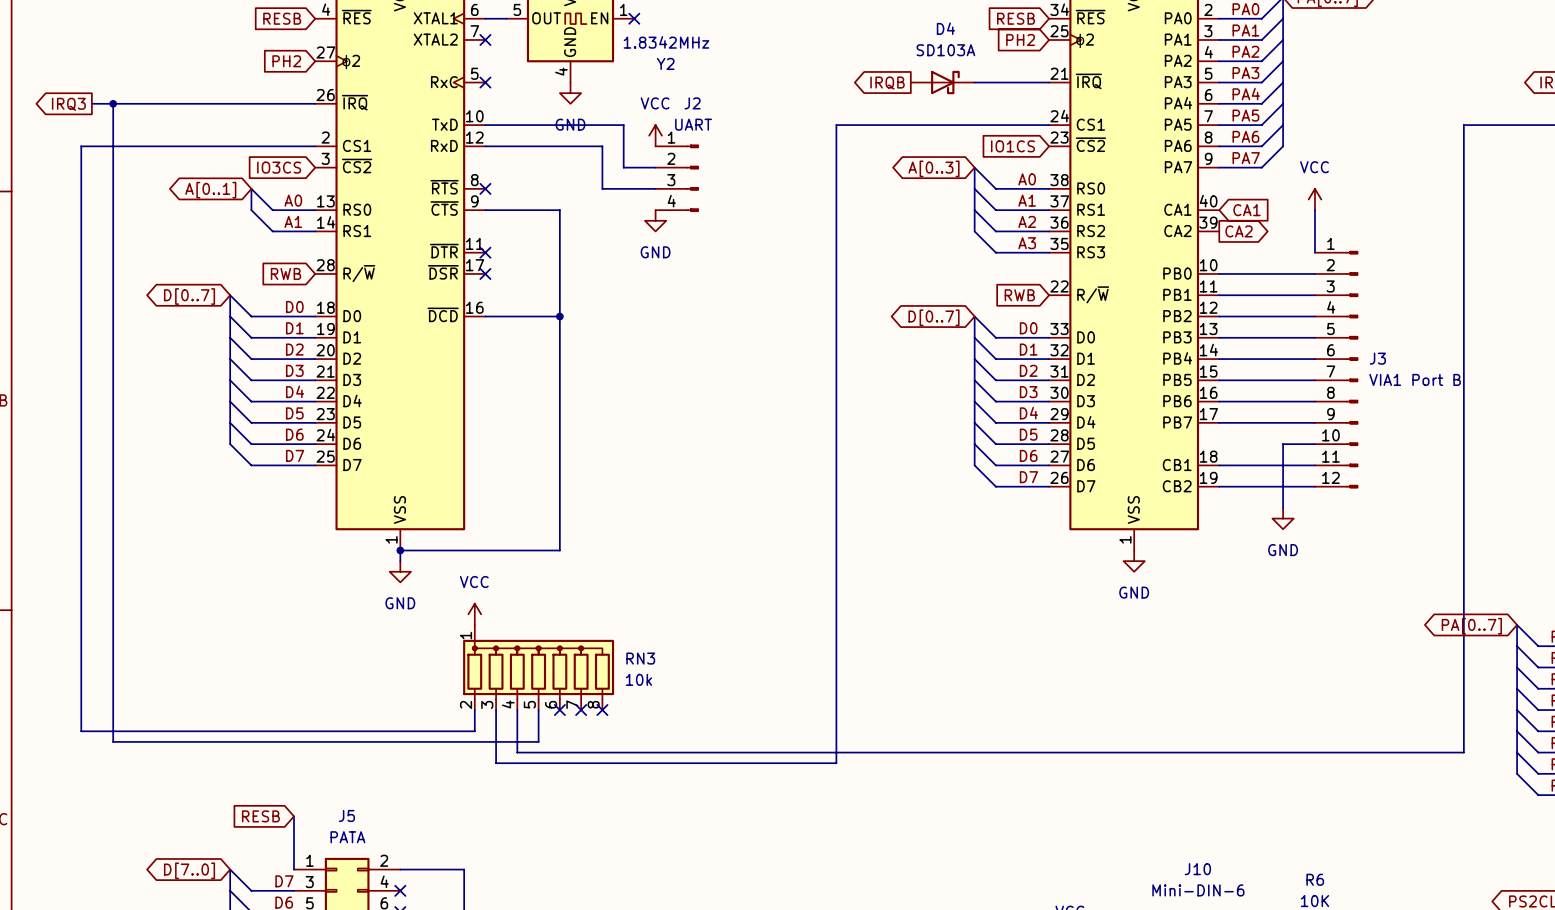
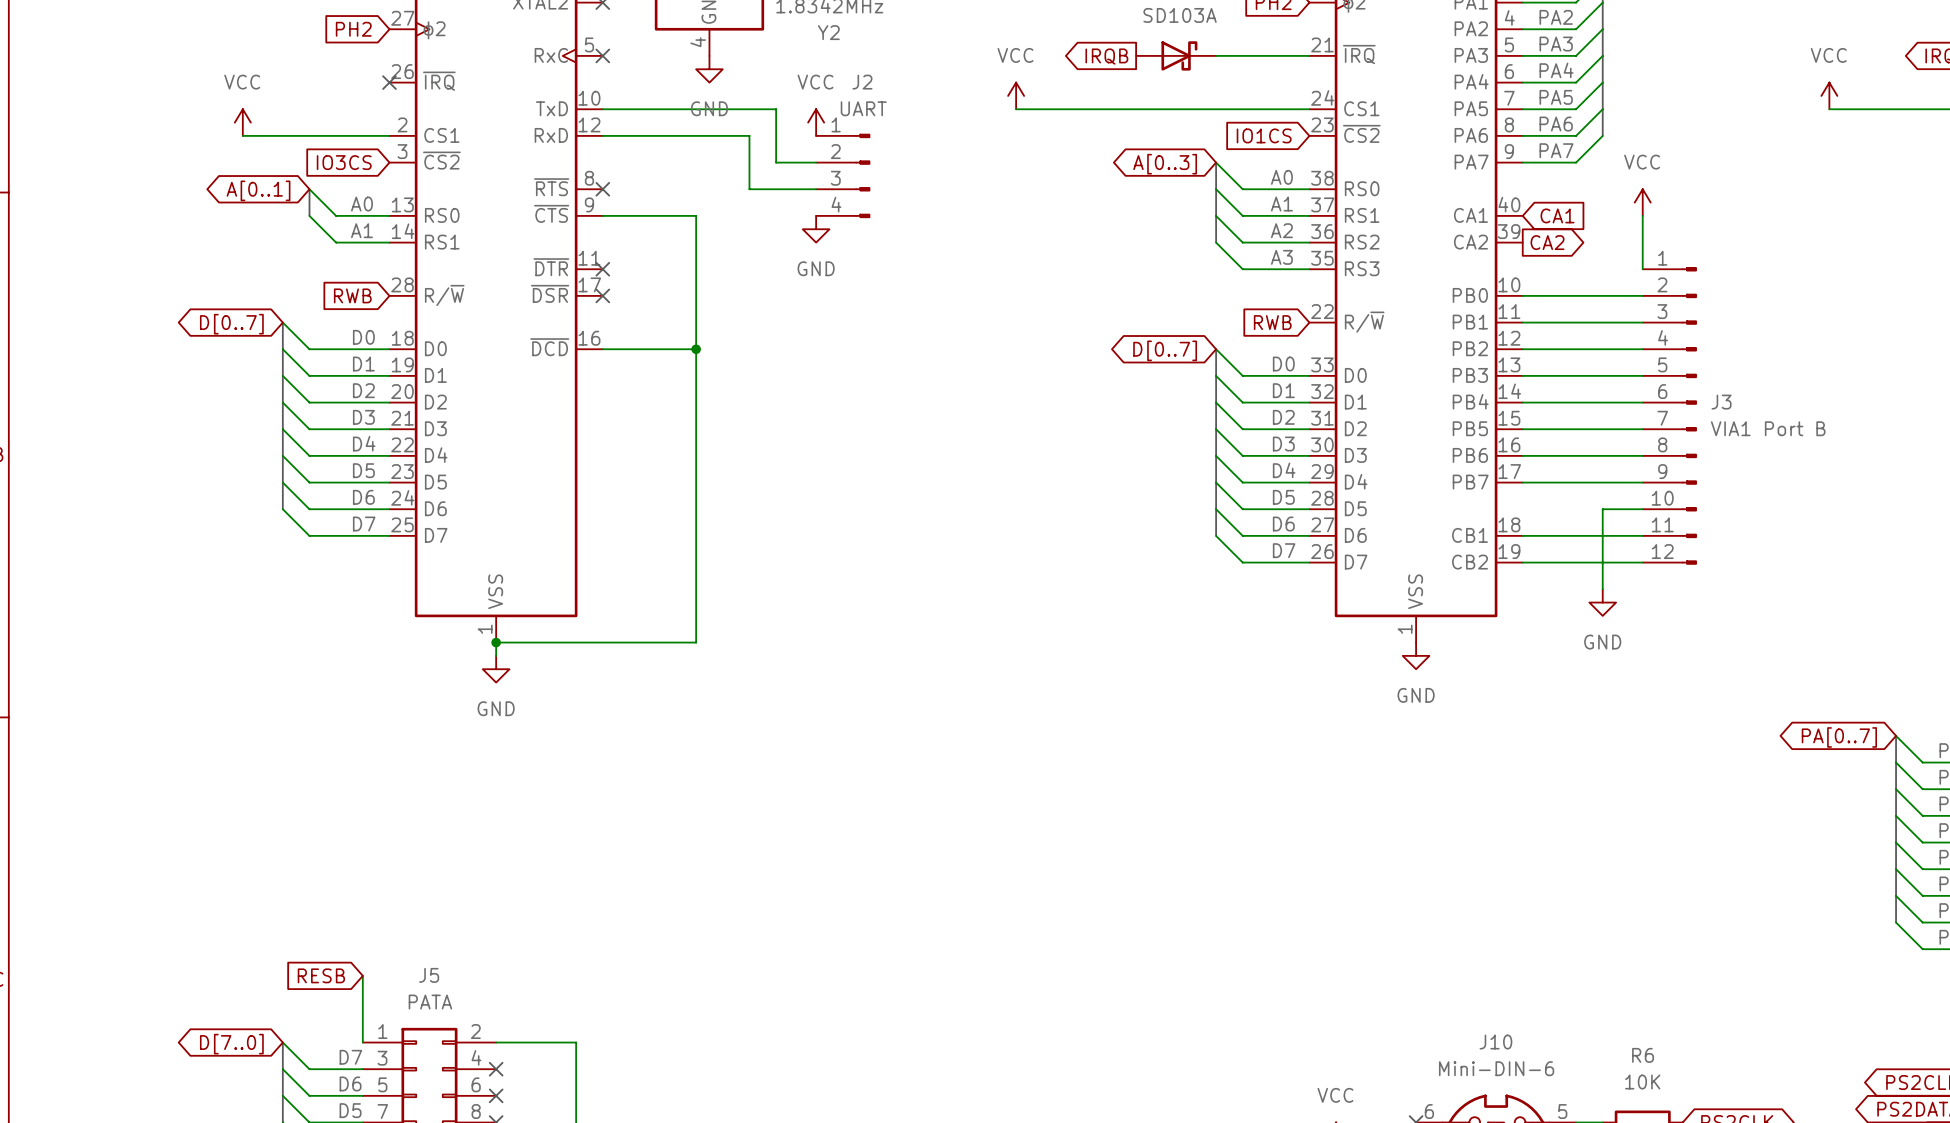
wire: (91, 103) (315, 103) -> none
wire: (113, 103) (113, 741) (538, 741) (538, 710) -> none
junction: (113, 103) -> none
no-connect mark: none -> (389, 82)
global label: IRQ3 (68, 104) -> none
power symbol: none -> VCC (1016, 95)
power symbol: none -> VCC (1829, 95)
wire: (836, 125) (836, 763) (496, 763) (496, 710) -> (1042, 109) (1016, 109)
wire: (1463, 125) (1463, 752) (517, 752) (517, 710) -> none
power symbol: none -> VCC (242, 122)
wire: (198, 146) (81, 146) (81, 731) (474, 731) (474, 710) -> none
power symbol: VCC (474, 614) -> none
RN3: 10k (538, 667) -> none
no-connect mark: (559, 710) -> none
no-connect mark: (581, 710) -> none
no-connect mark: (602, 710) -> none

